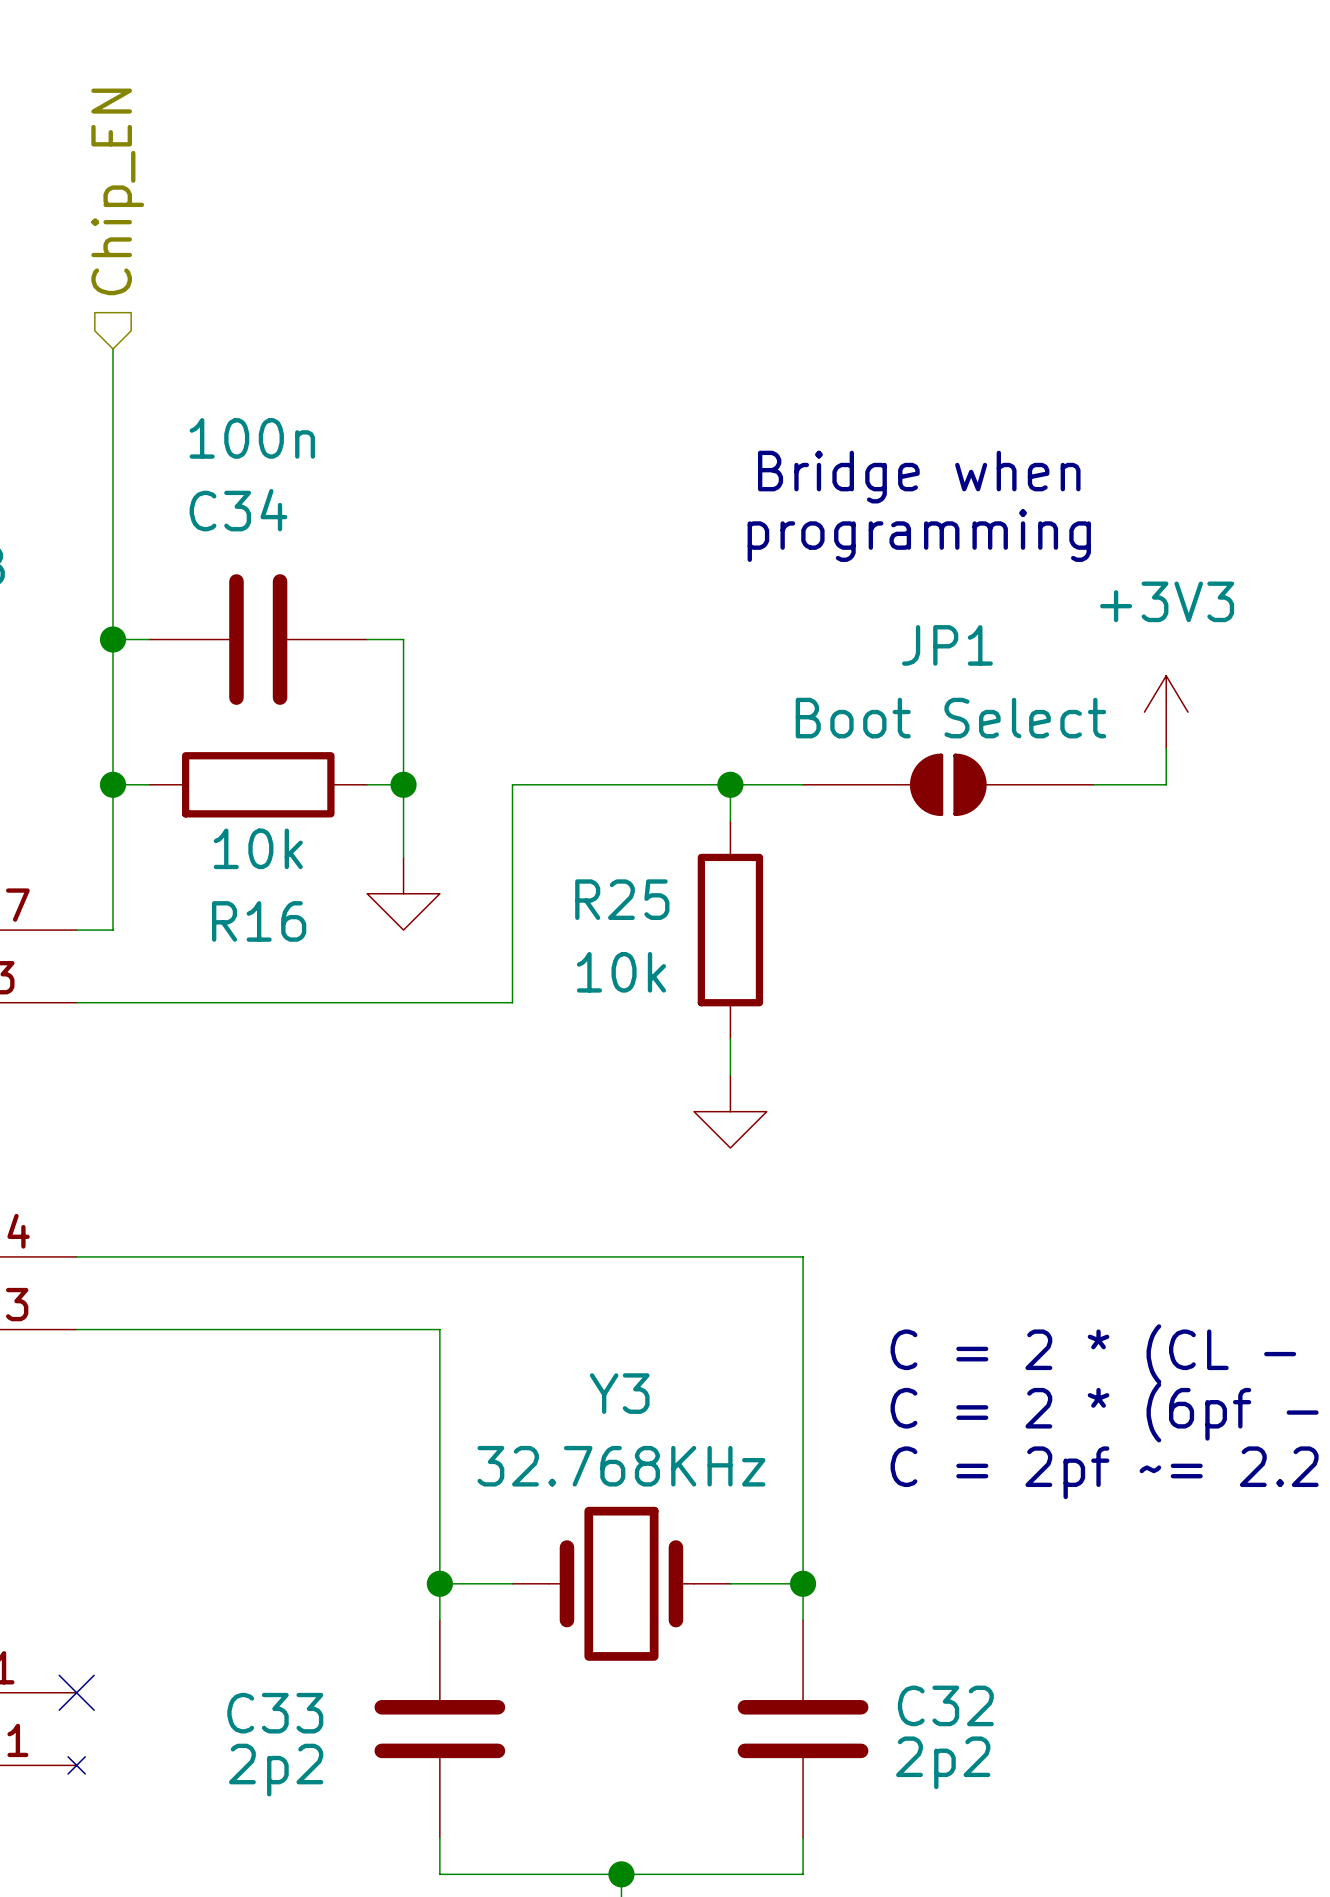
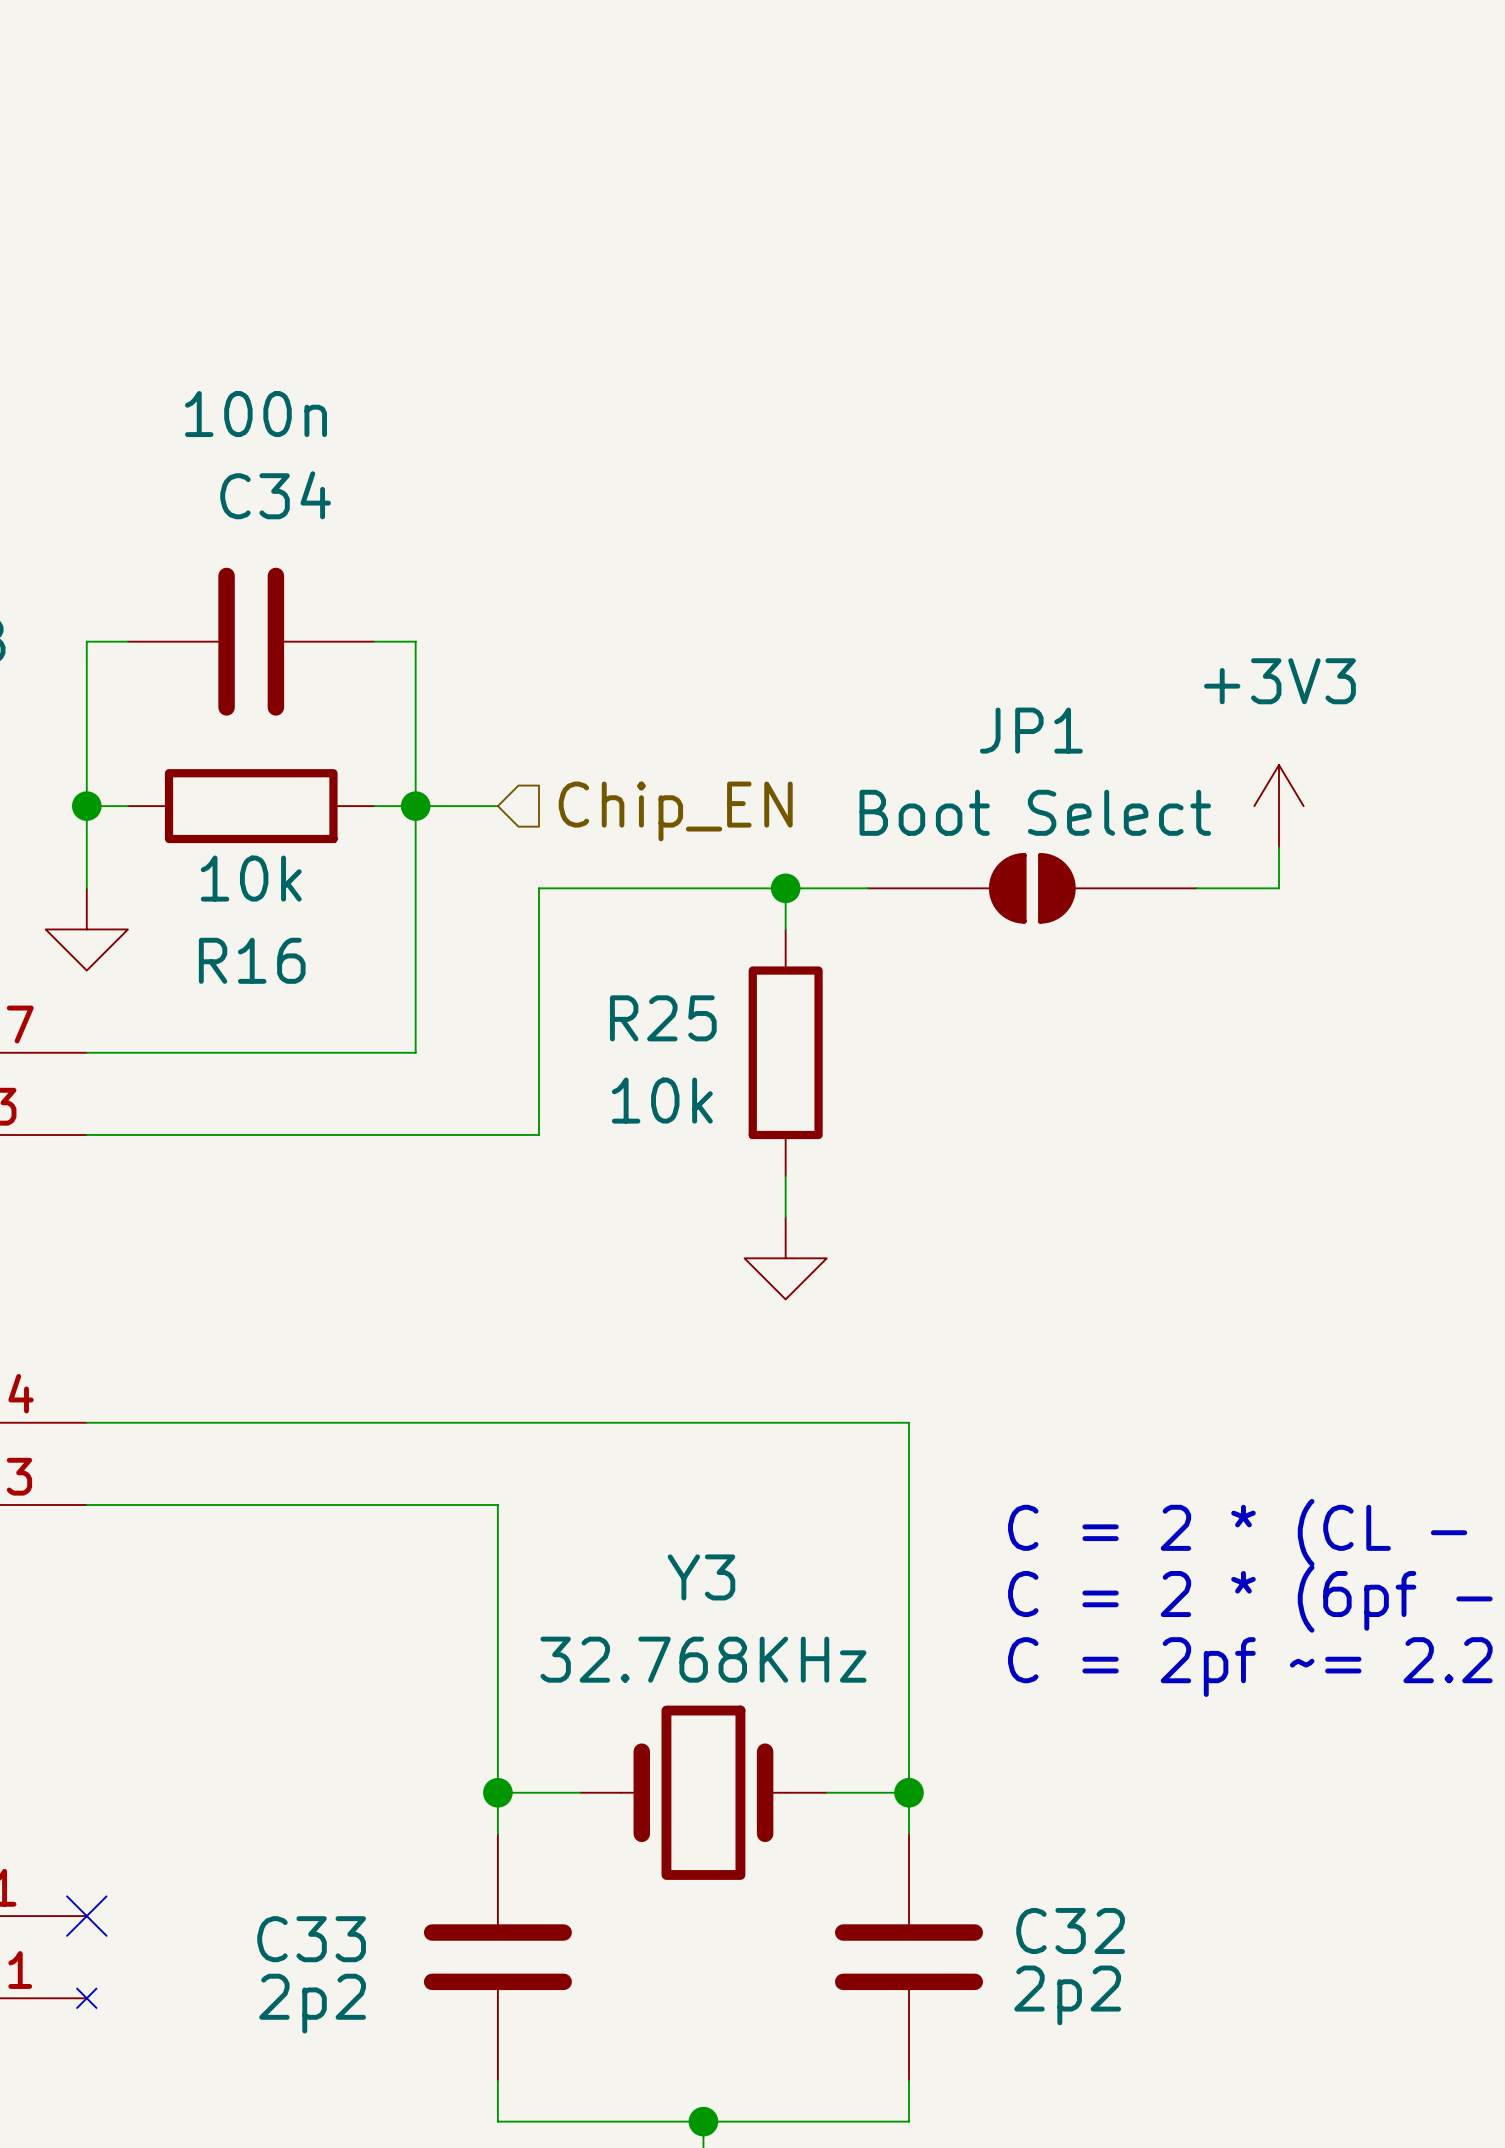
hierarchical label rotation: 0° (117, 191) -> 90° clockwise (675, 811)
hierarchical label position: Chip_EN (117, 191) -> Chip_EN (675, 811)
wire: (113, 348) (113, 930) -> (374, 641) (415, 641) (415, 1052) (127, 1052)
C34 value position: 100n (252, 438) -> 100n (256, 414)
text: Bridge when (919, 477) -> none
C34 name position: C34 (238, 510) -> C34 (275, 495)
text: programming (919, 535) -> none
wire: none -> (127, 641) (86, 641) (86, 888)
wire: (113, 639) (149, 639) -> none
junction: (113, 639) -> none
C34 position: (258, 639) -> (251, 641)
wire: (367, 639) (403, 639) (403, 857) -> none
junction: none -> (86, 806)
wire: none -> (374, 806) (497, 806)
power symbol position: +3V3 (1166, 712) -> +3V3 (1278, 806)
wire: (1166, 748) (1166, 784) (1129, 784) -> (1278, 847) (1278, 888)
wire: (113, 784) (149, 784) -> (86, 806) (127, 806)
junction: (113, 784) -> none
R16 position: (258, 784) -> (251, 806)
wire: (367, 784) (403, 784) -> none
junction position: (403, 784) -> (415, 806)
wire: (512, 784) (512, 1002) (476, 1002) -> (580, 888) (539, 888) (539, 1134)
wire: (730, 784) (730, 821) -> (785, 888) (785, 929)
junction position: (730, 784) -> (785, 888)
JP1 position: (948, 784) -> (1032, 888)
power symbol: none -> (86, 929)
power symbol: (403, 893) -> none
R25 position: (730, 930) -> (785, 1052)
wire: (730, 1039) (730, 1075) -> (785, 1176) (785, 1217)
power symbol position: (730, 1111) -> (785, 1258)

